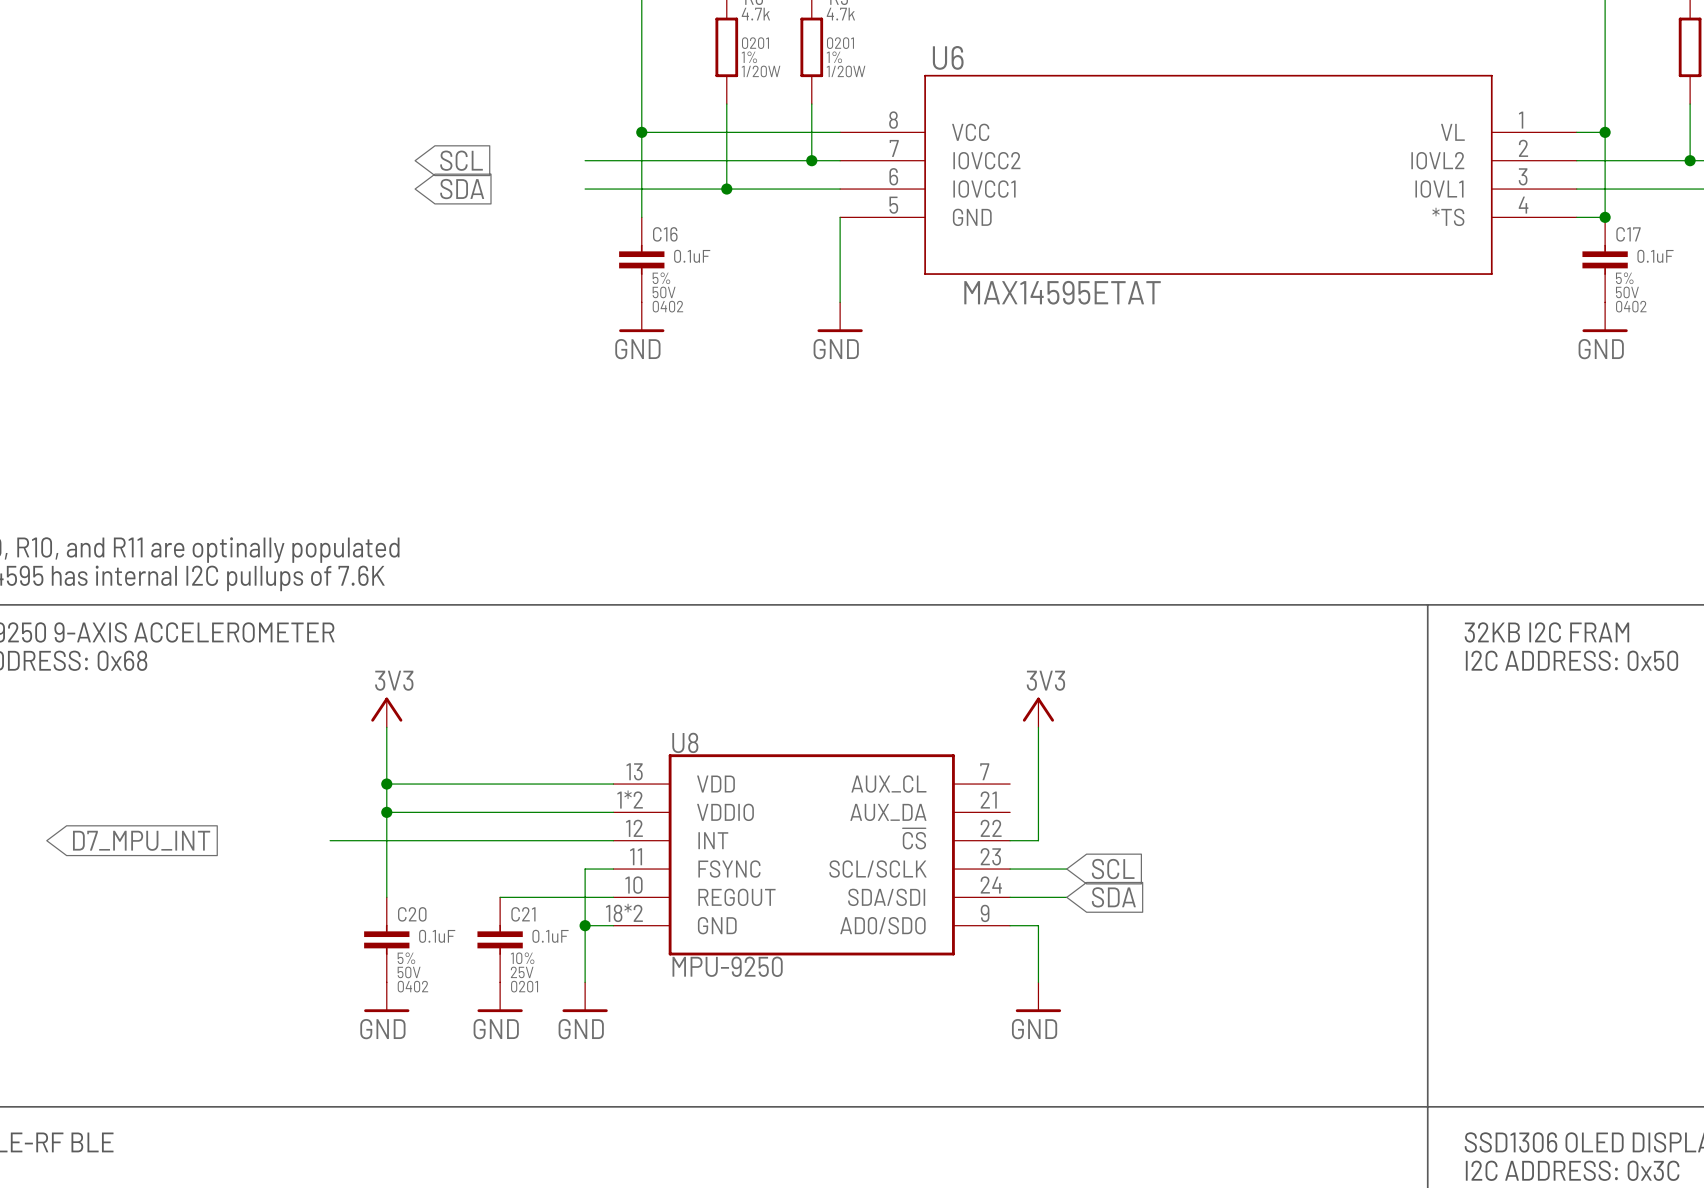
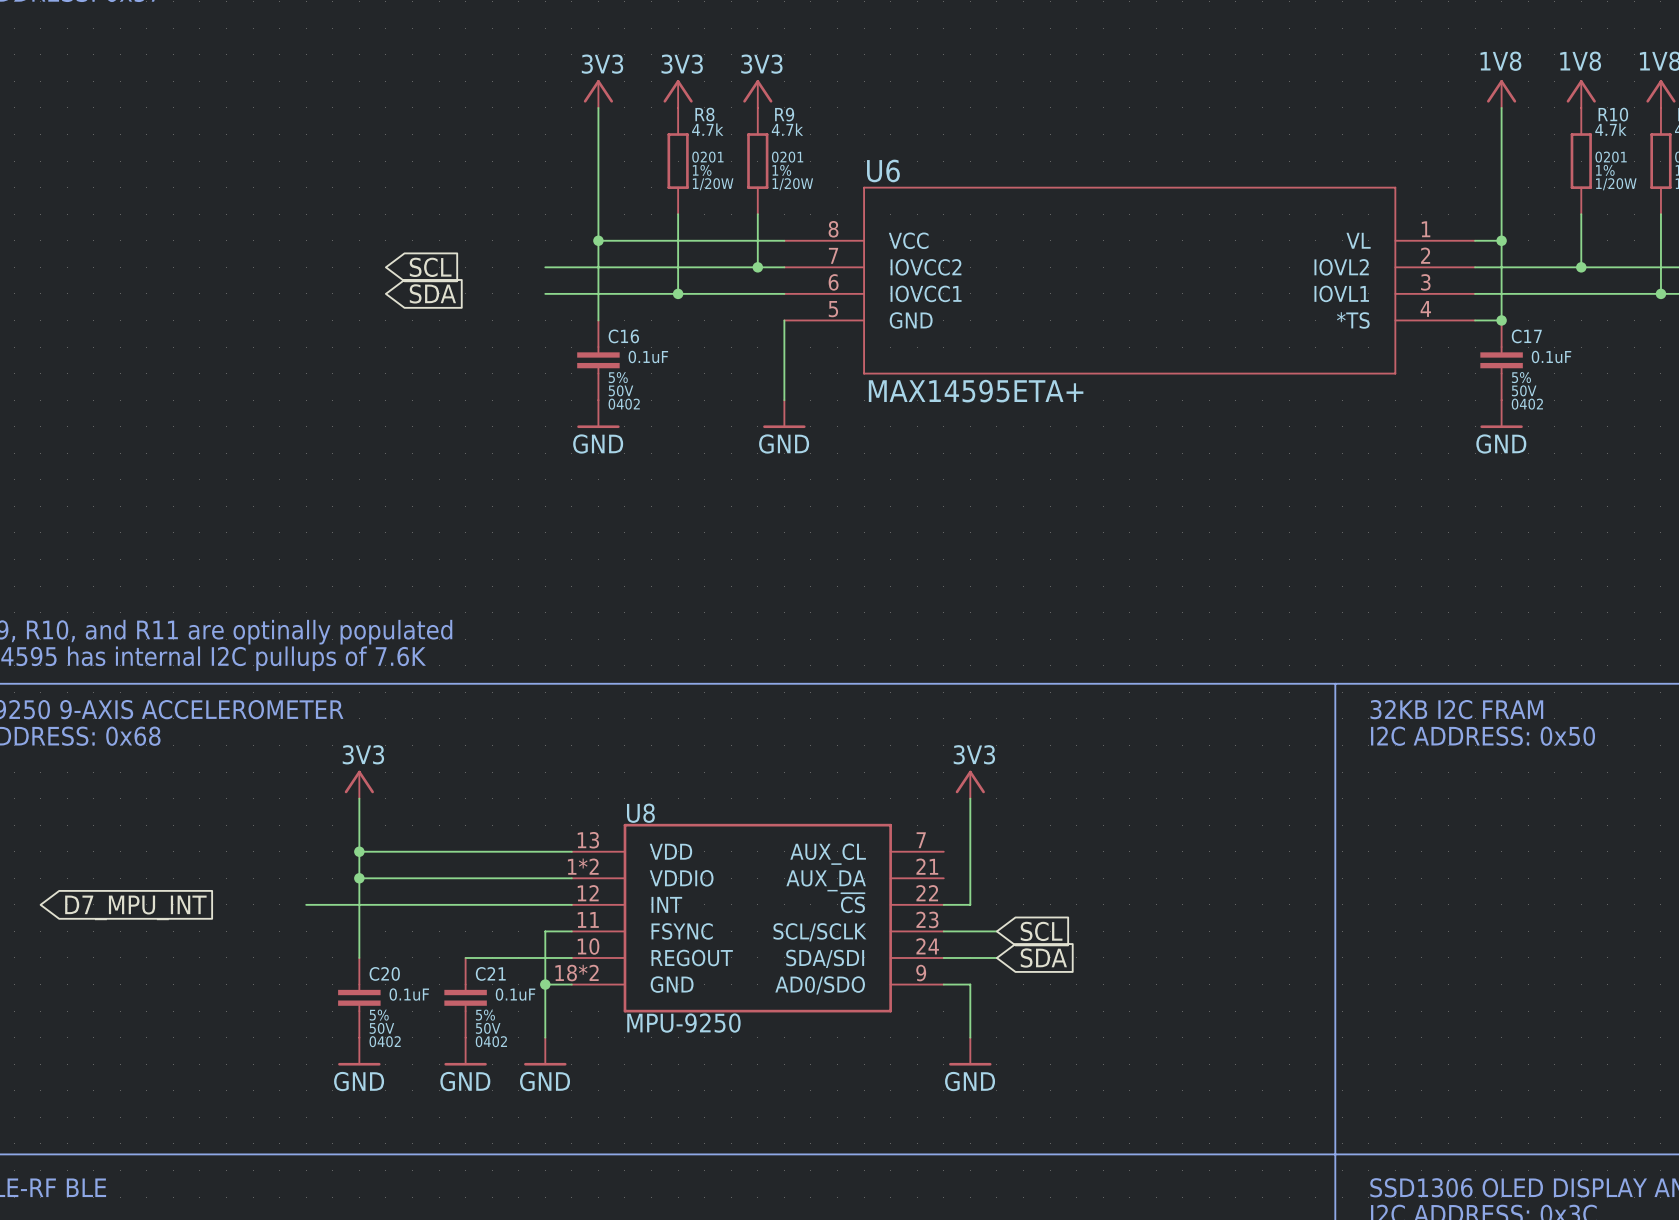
U6 value: MAX14595ETAT (1062, 292) -> MAX14595ETA+ (976, 391)
C21 text: 10% (522, 958) -> 5% (485, 1015)
C21 text: 25V (522, 972) -> 50V (488, 1028)
C21 text: 0201 (524, 986) -> 0402 (491, 1041)

